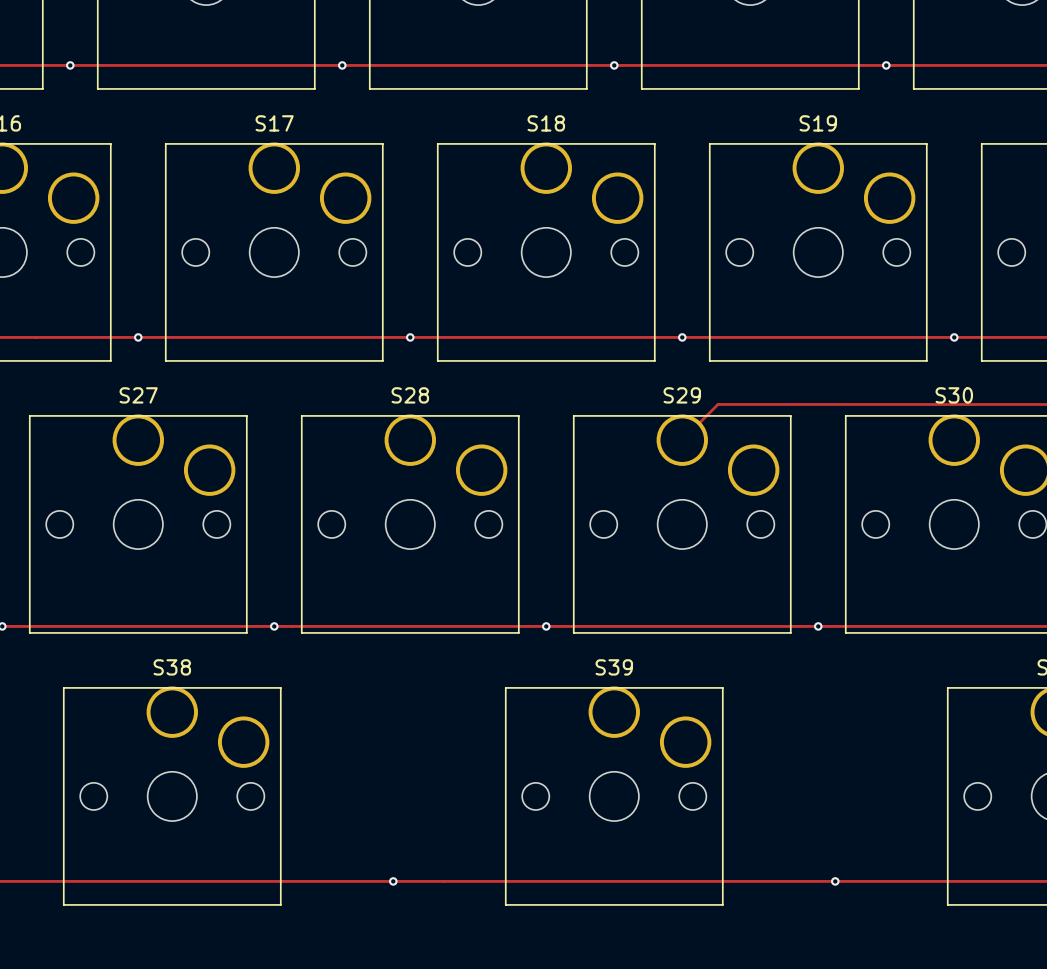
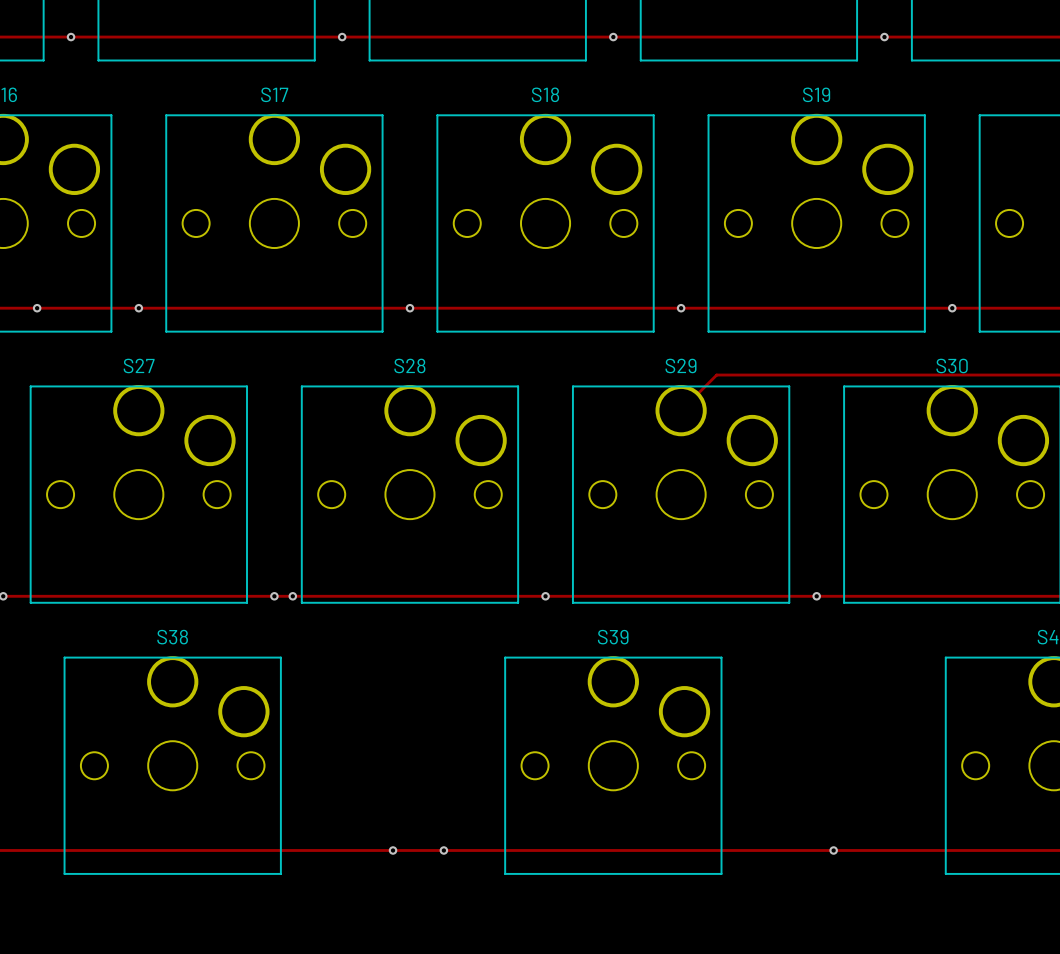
via: none -> (37, 308)
via: none -> (292, 596)
via: none -> (443, 850)

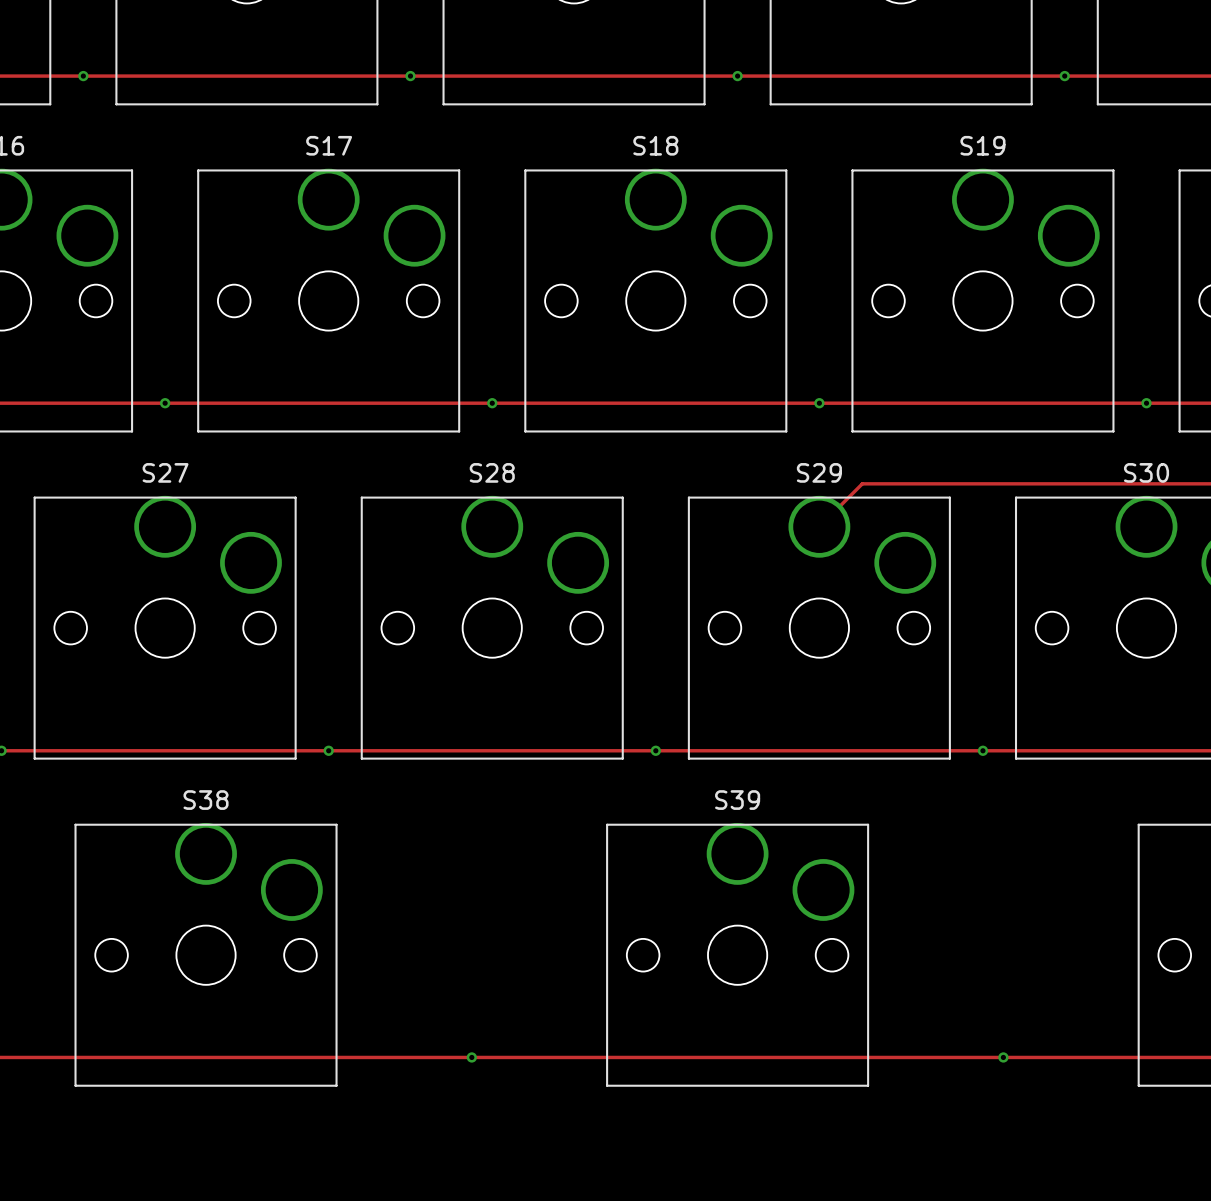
via: (37, 308) -> none
via: (292, 596) -> none
via: (443, 850) -> none

